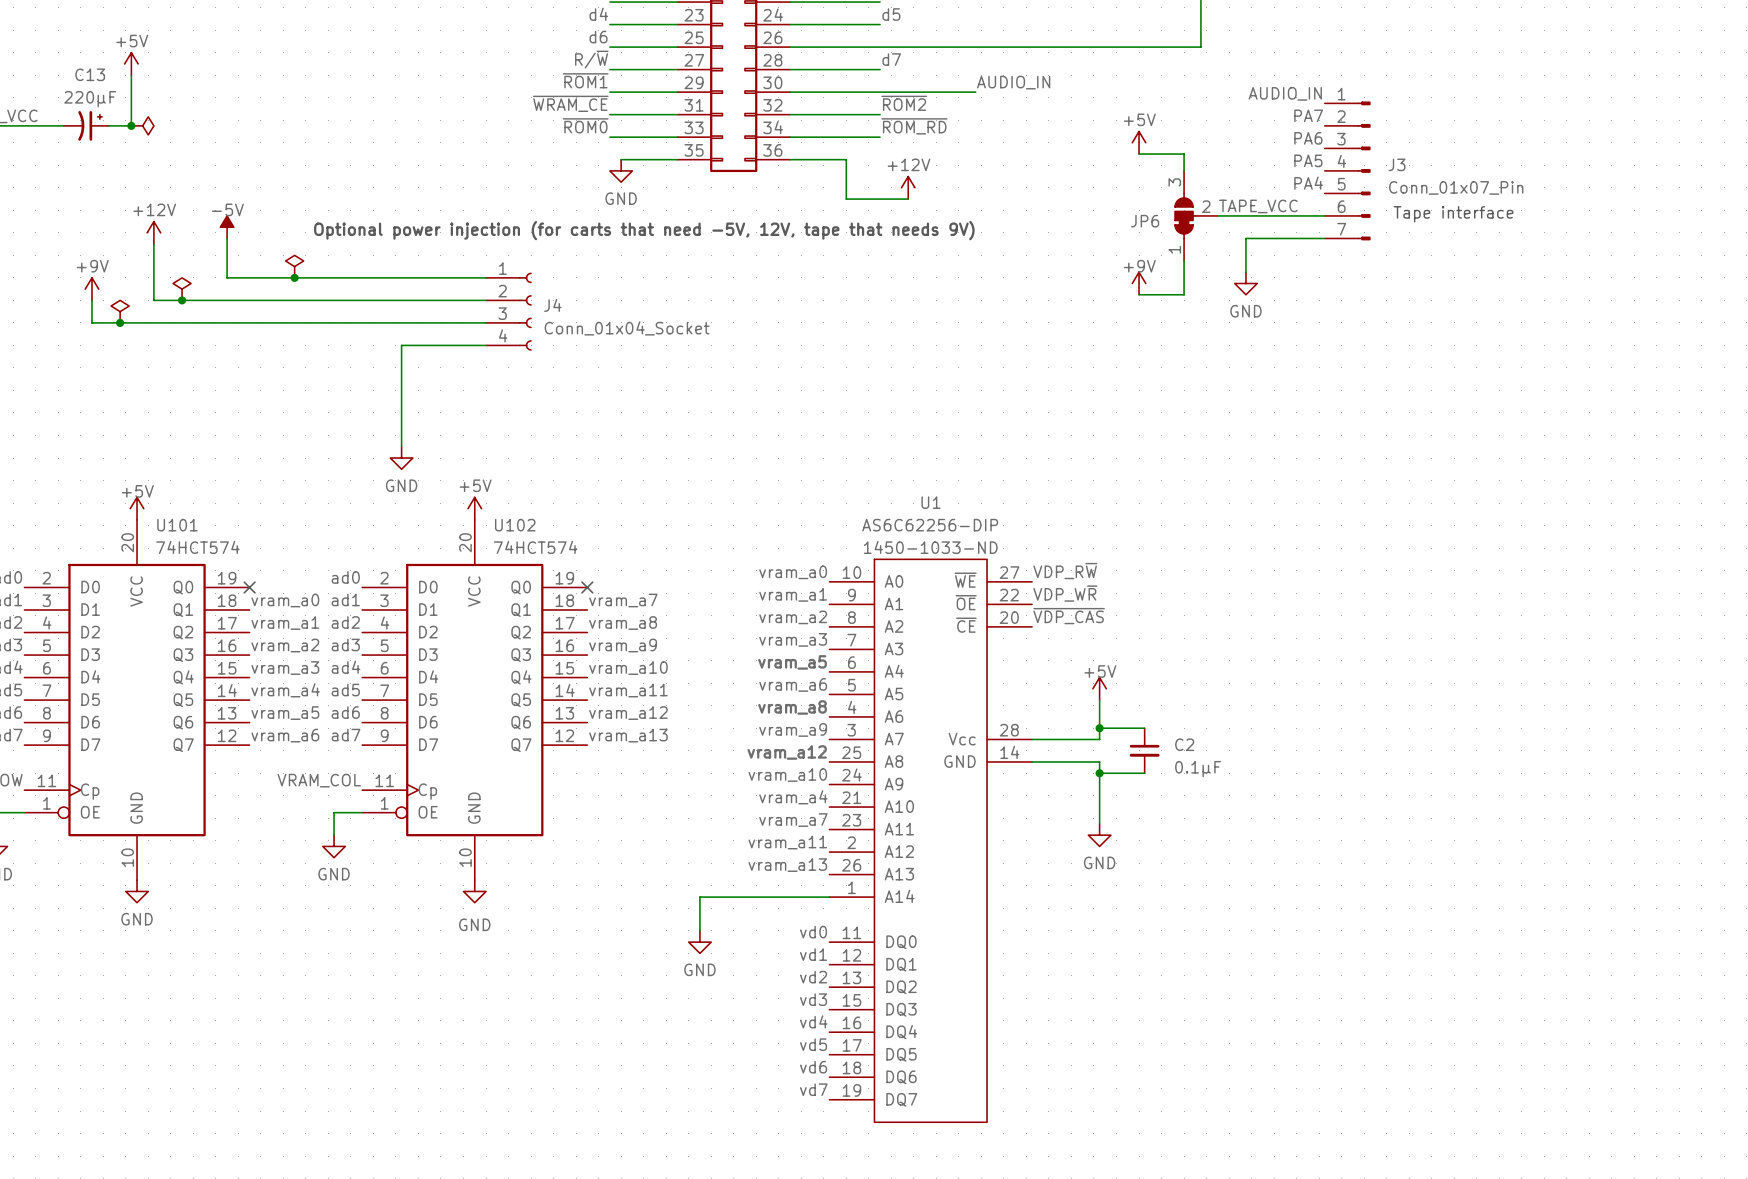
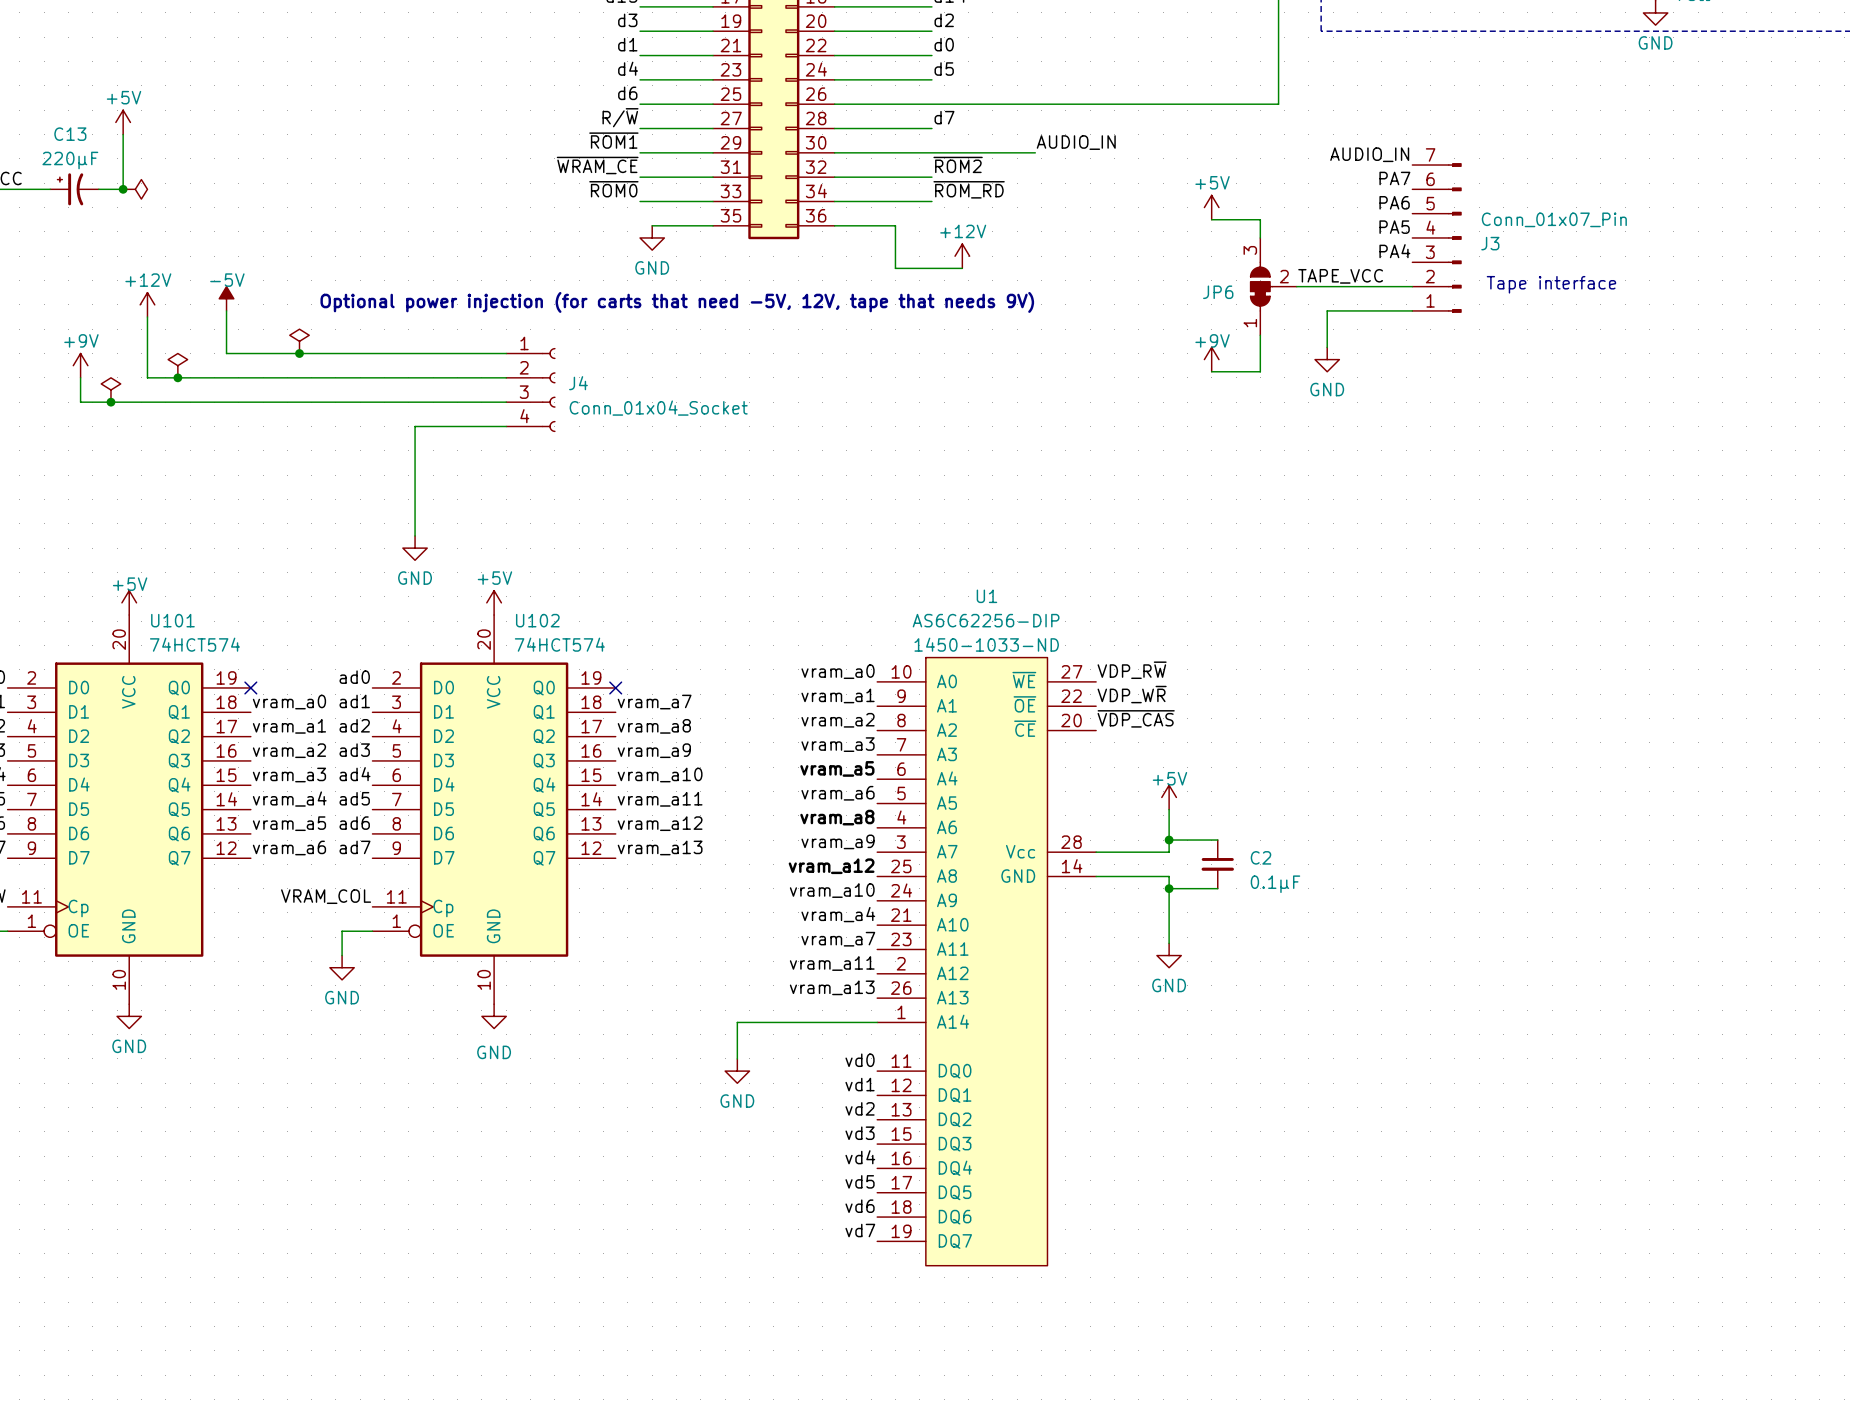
C13 flip: as is (90, 125) -> left-right (70, 189)
J3 flip: as is (1364, 170) -> up-down (1454, 237)

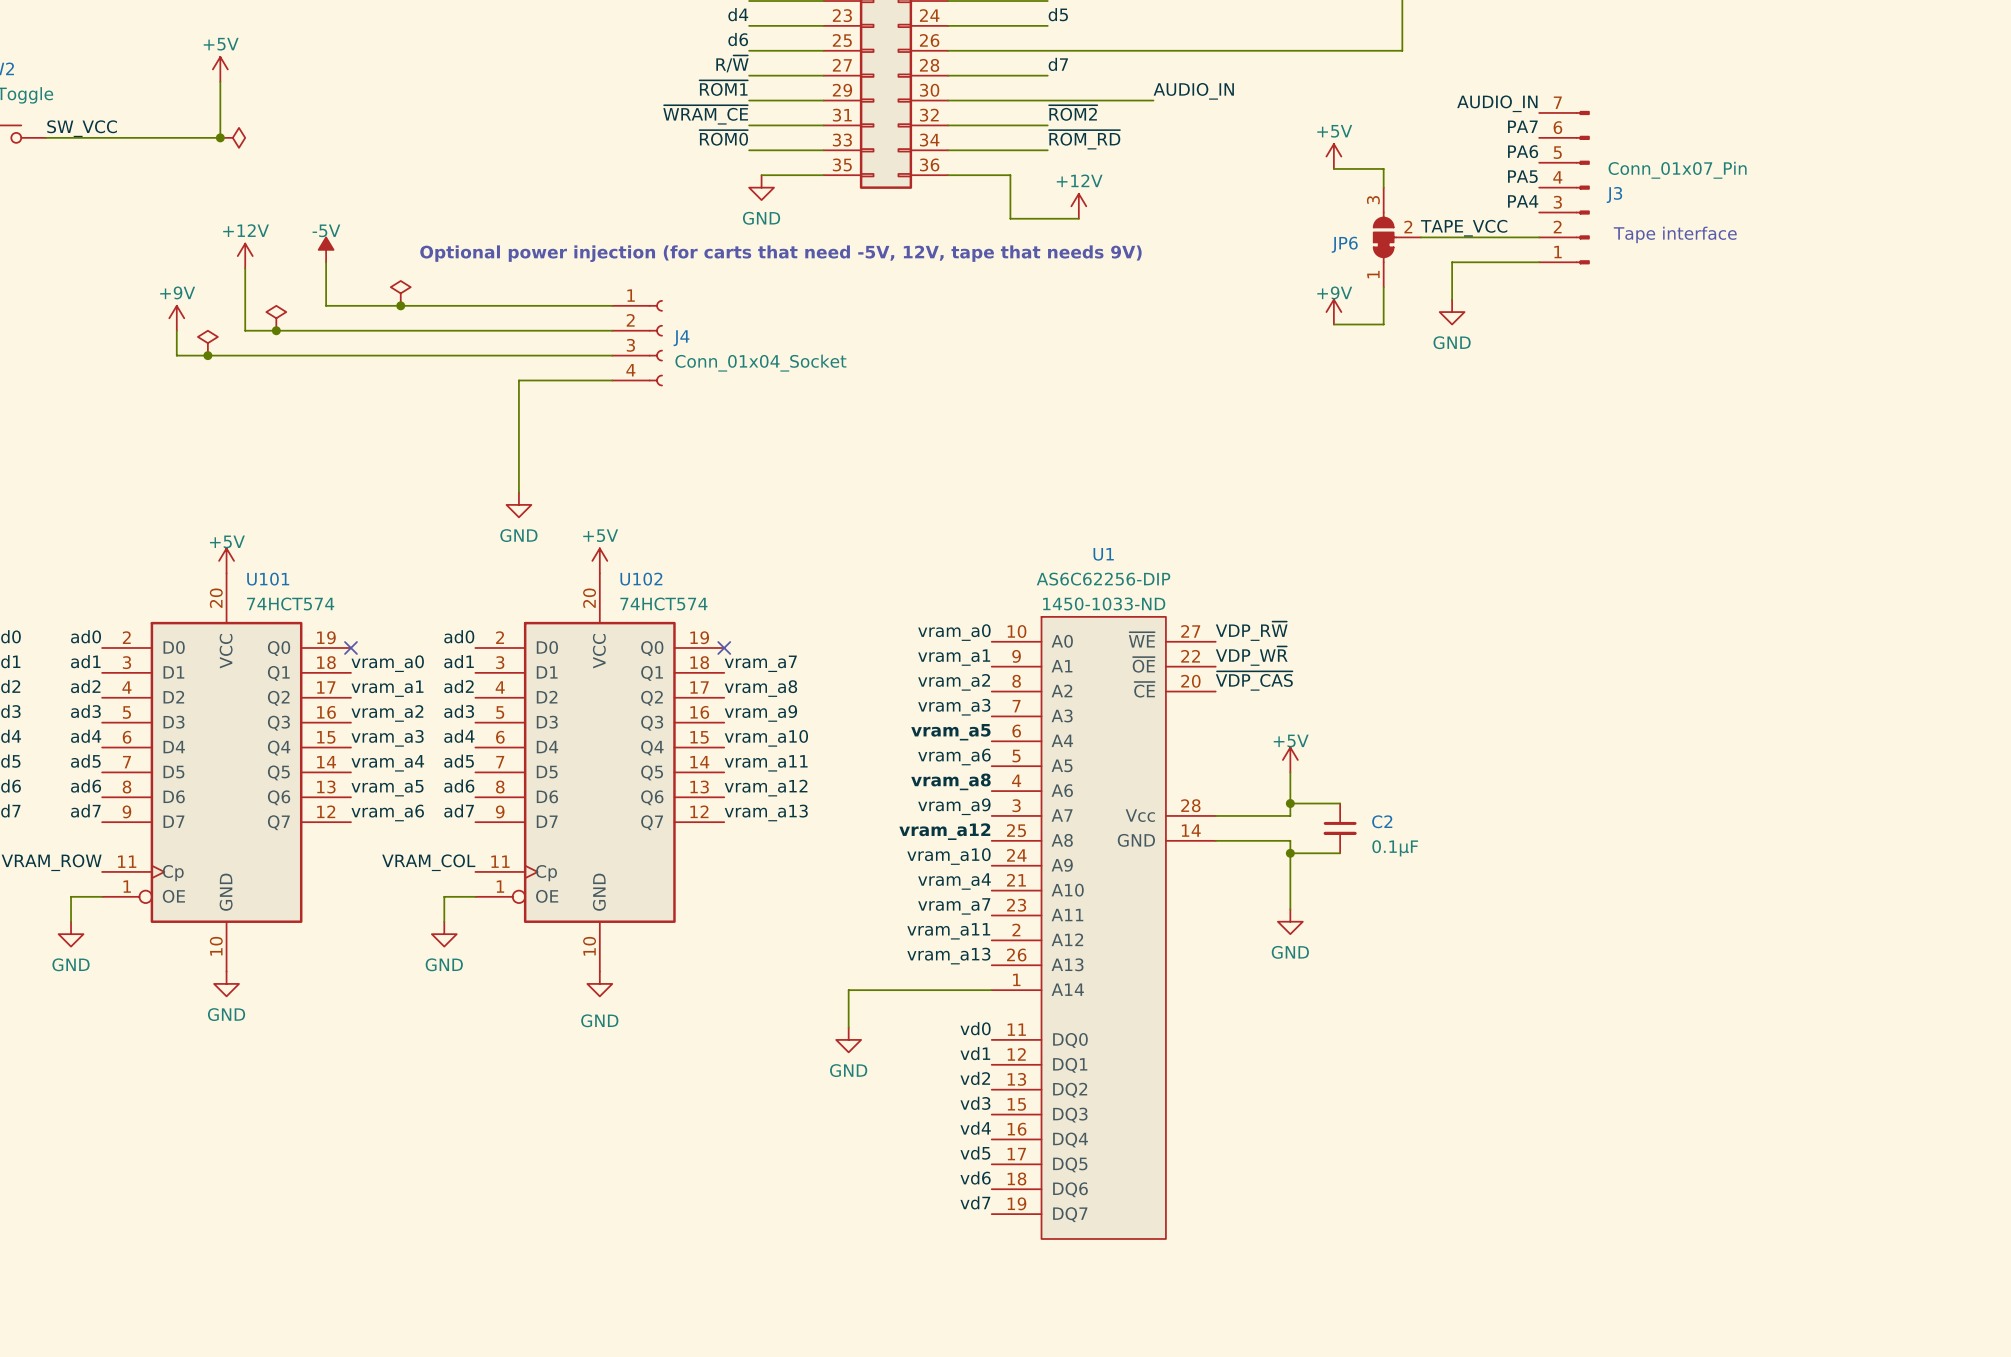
C13: 220µF (74, 189) -> none

